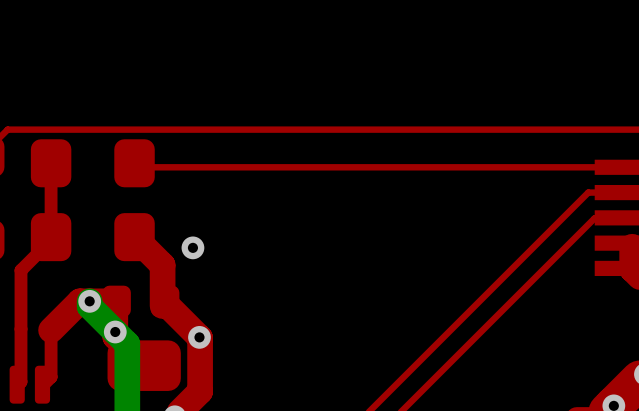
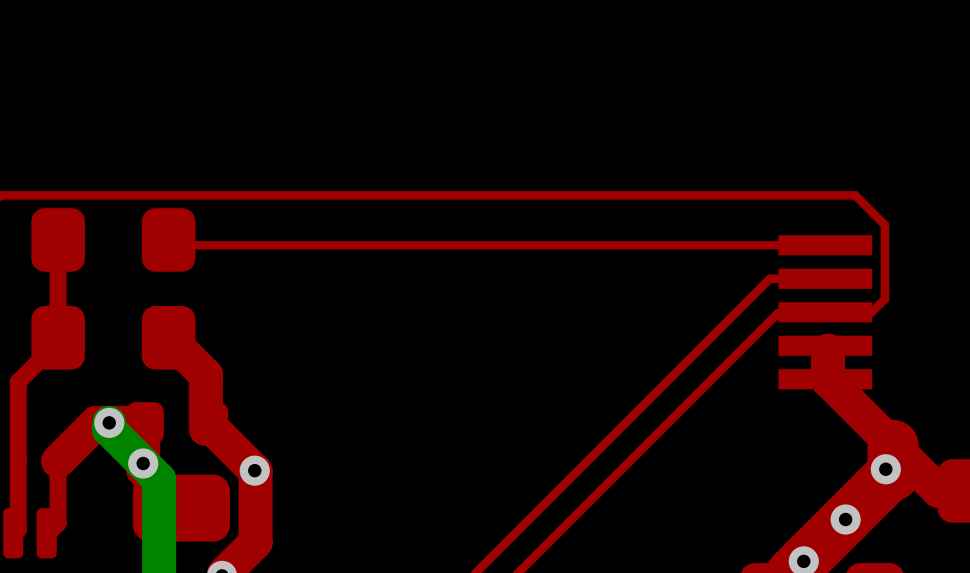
via: (192, 247) -> none

